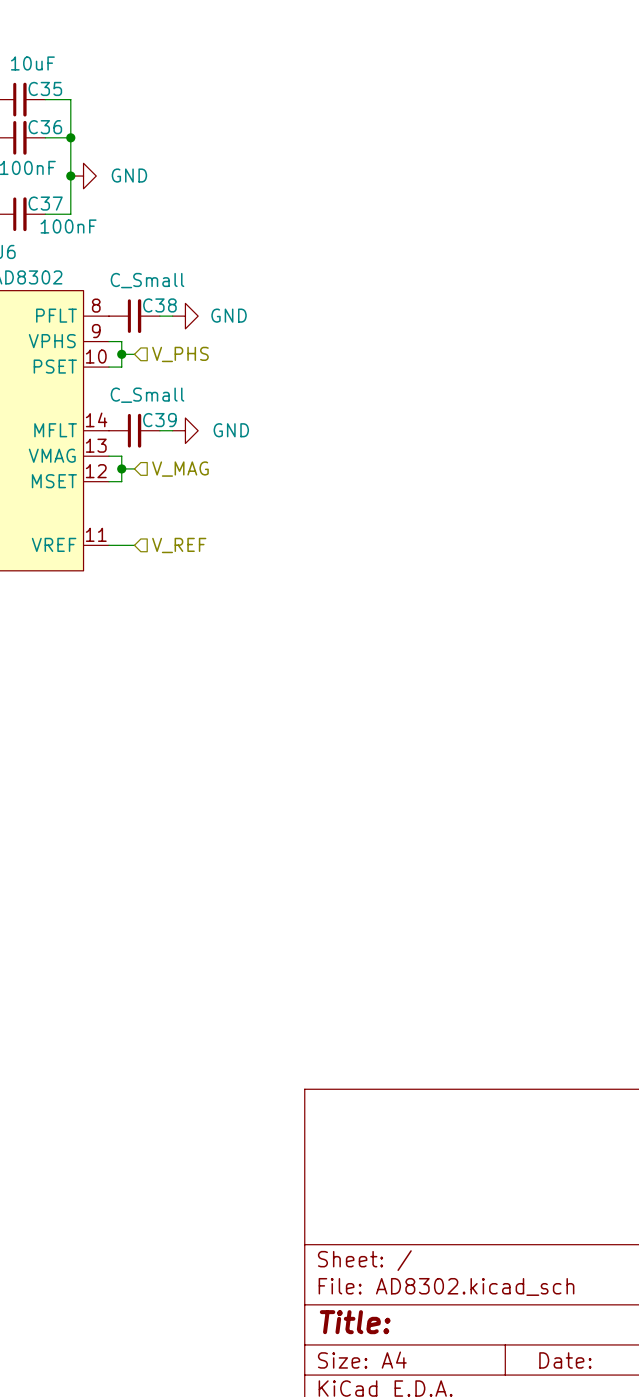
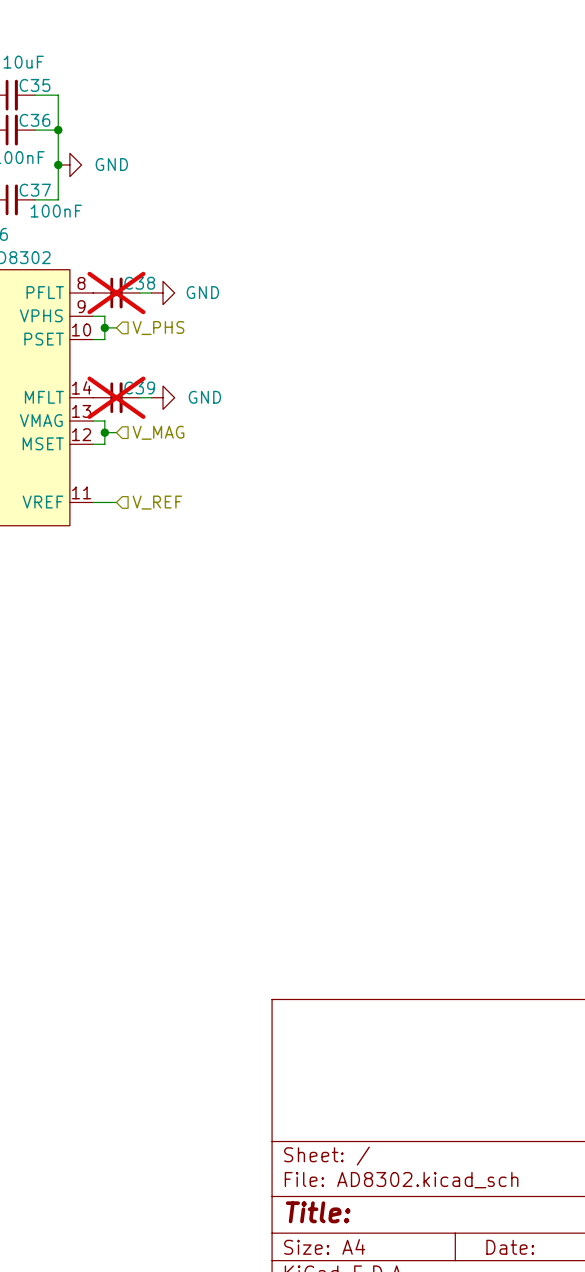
C38 value: C_Small (147, 280) -> none
C38 do-not-place cross: none -> (116, 292)
C39 value: C_Small (147, 395) -> none
C39 do-not-place cross: none -> (116, 397)

